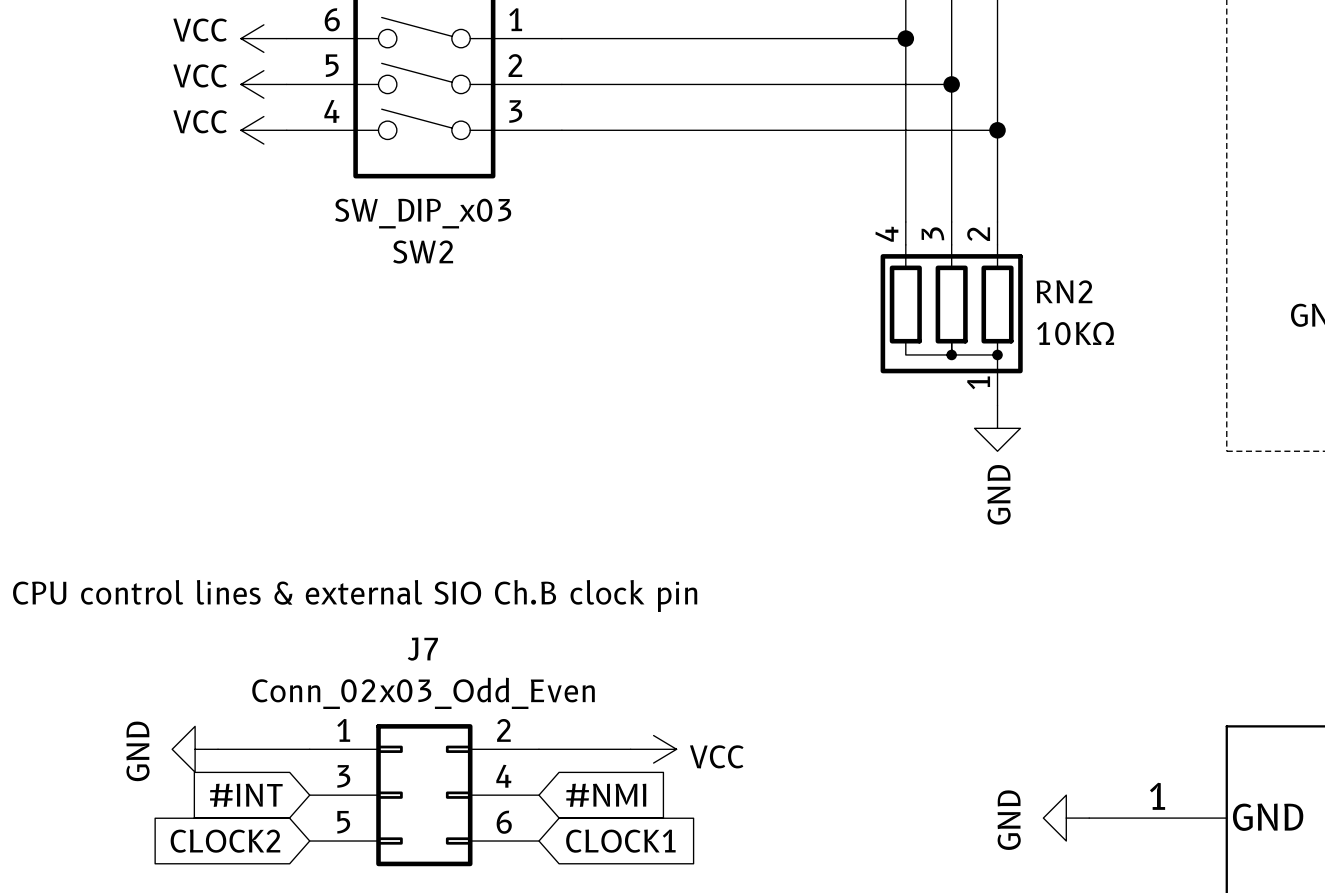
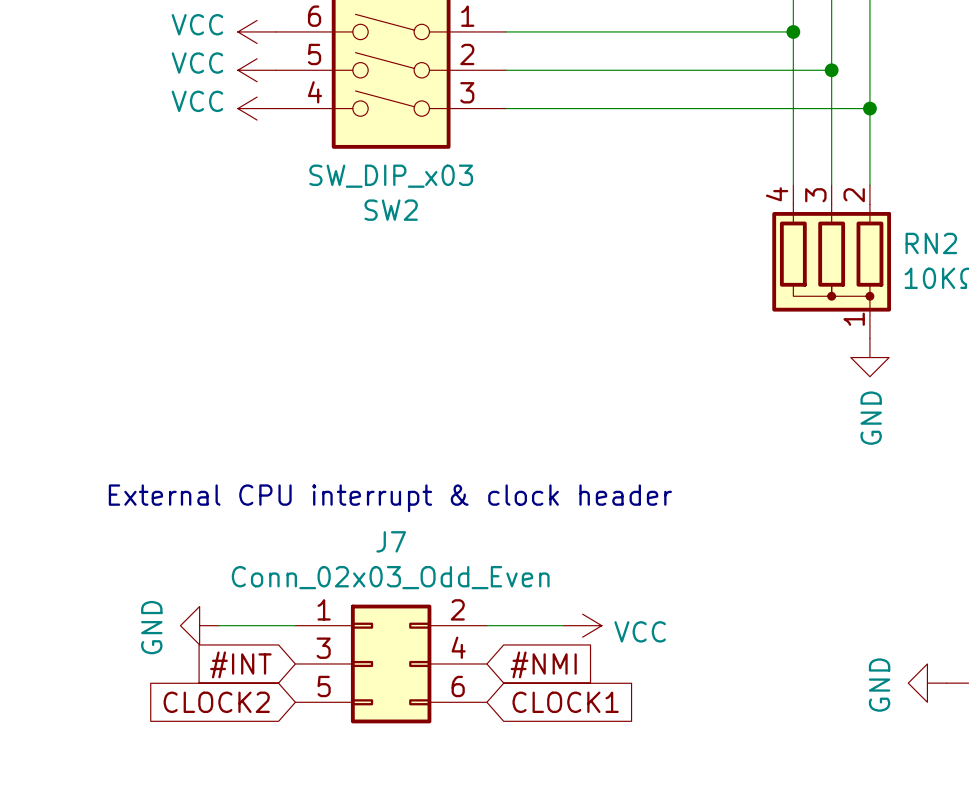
text: CPU control lines & external SIO Ch.B clock pin (355, 595) -> none
text: none -> External CPU interrupt & clock header (390, 498)

